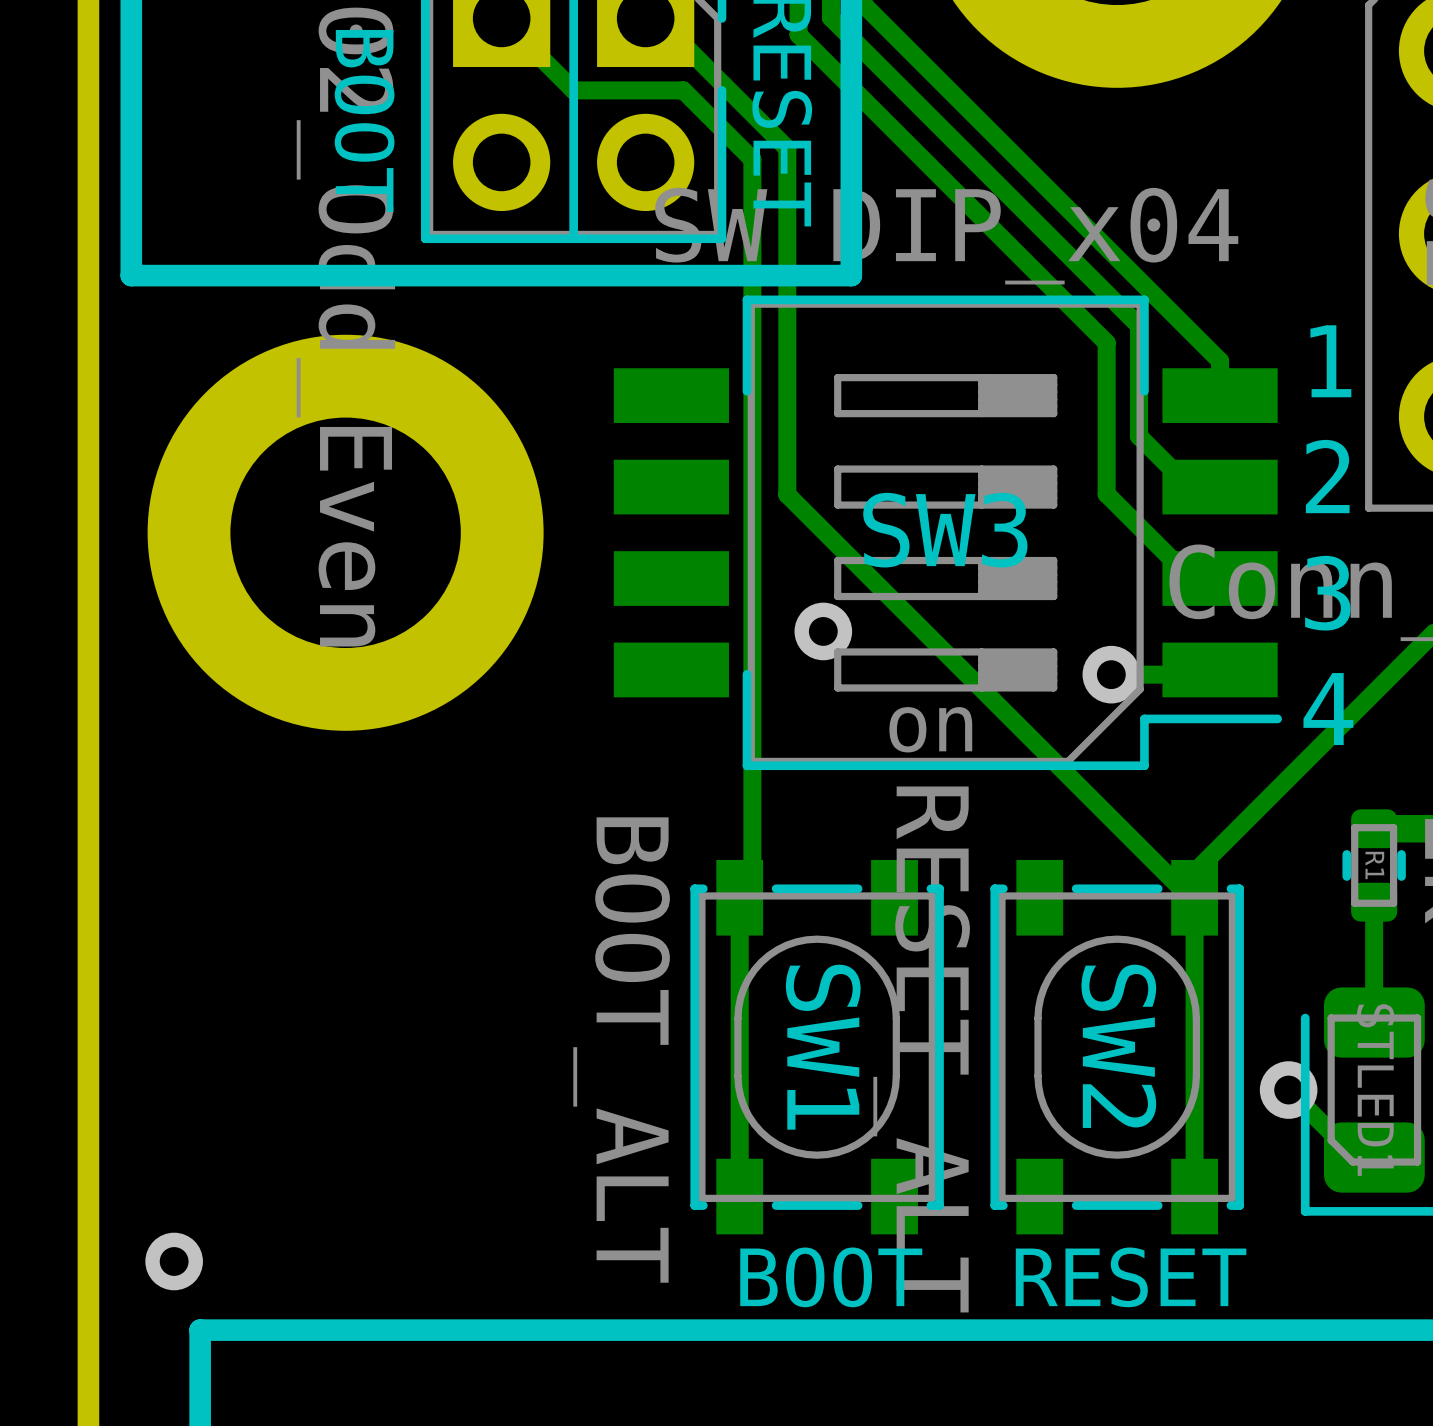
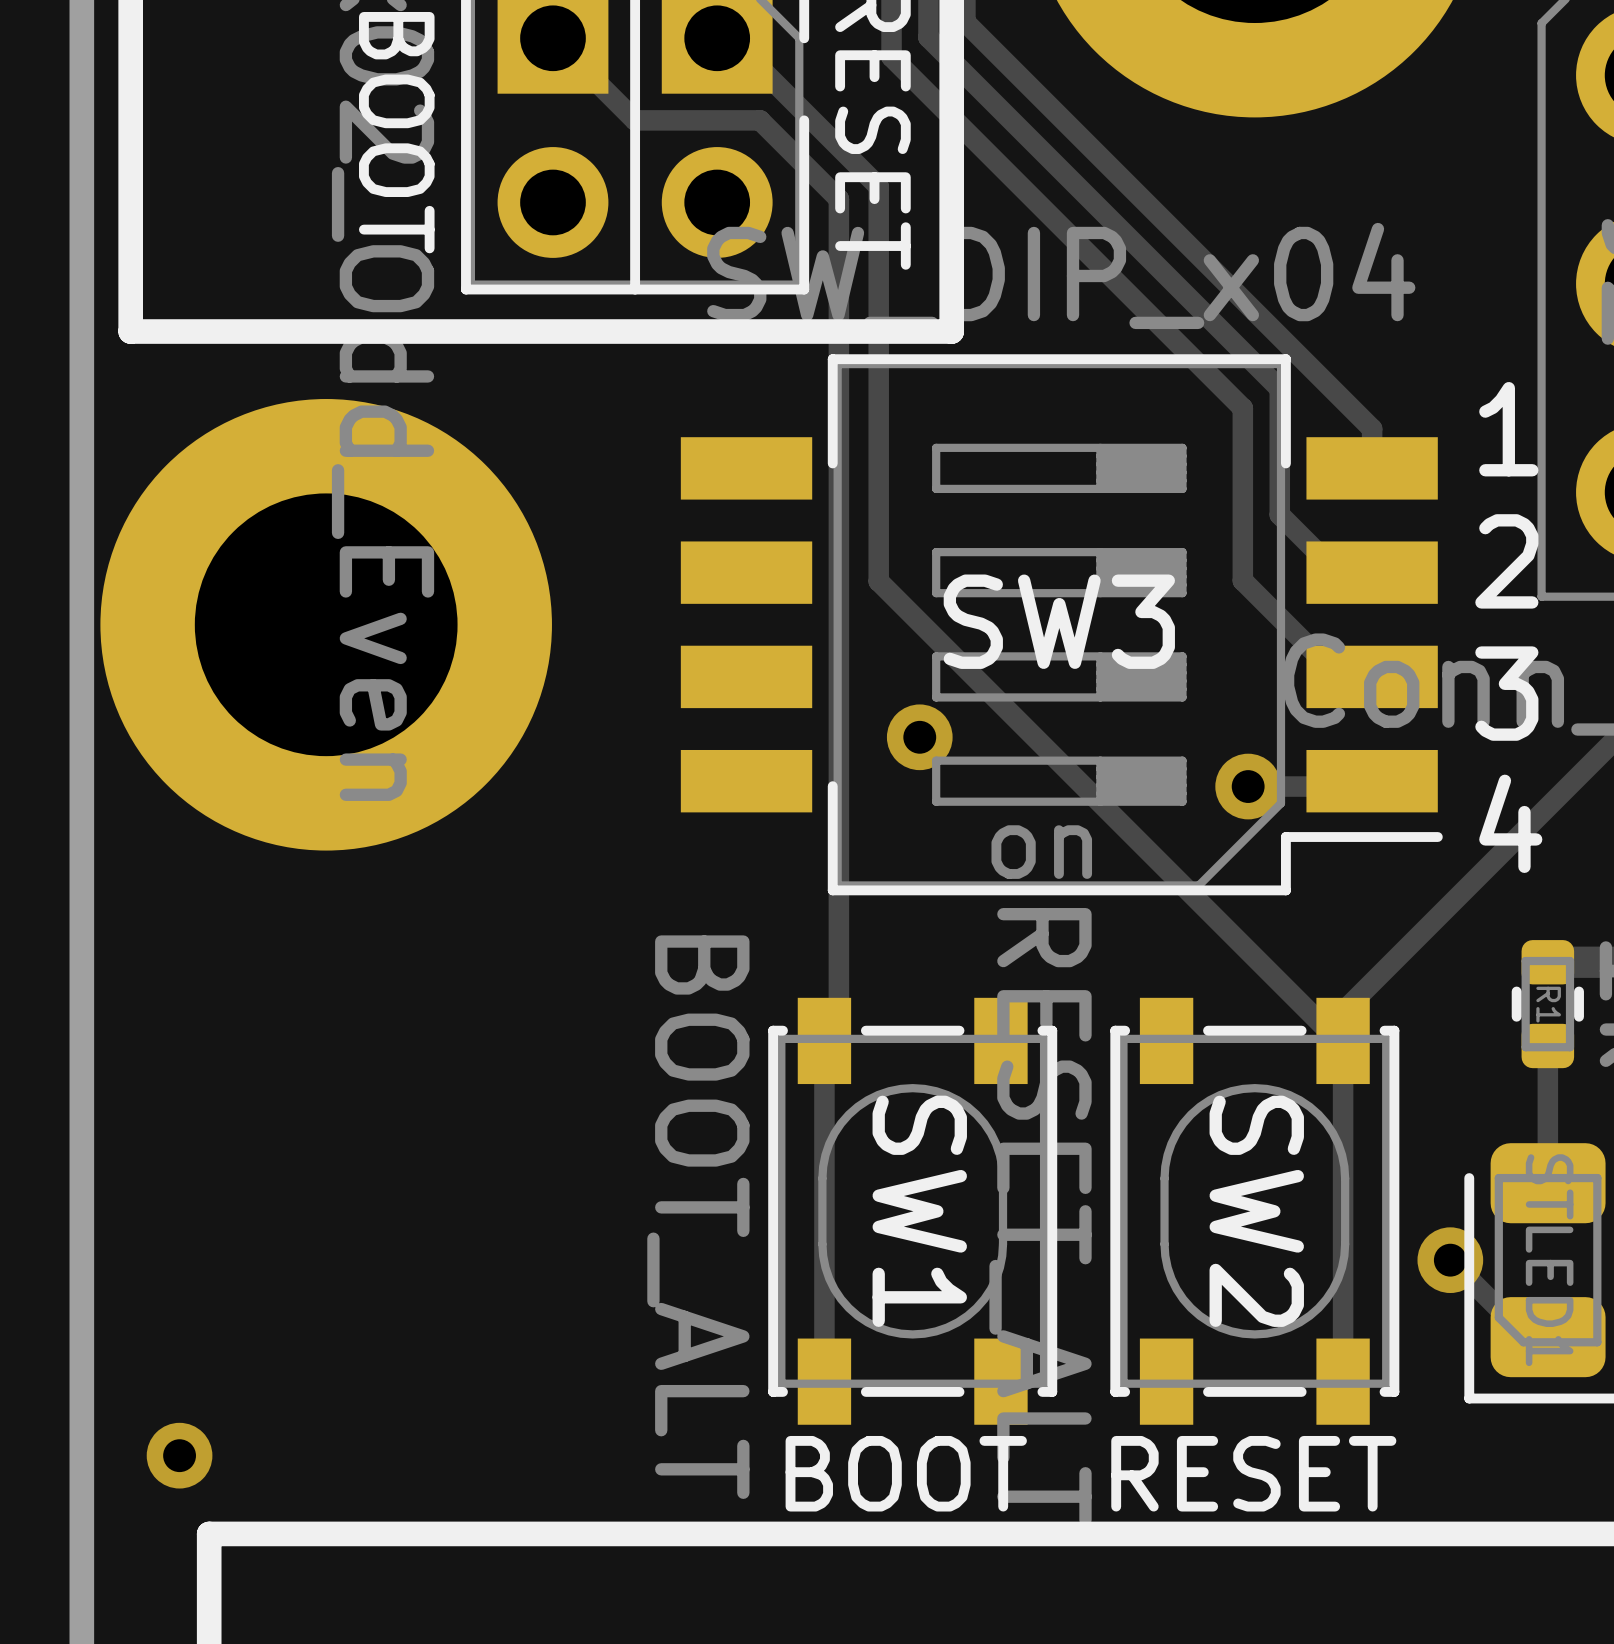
part position: (345, 532) -> (326, 624)

